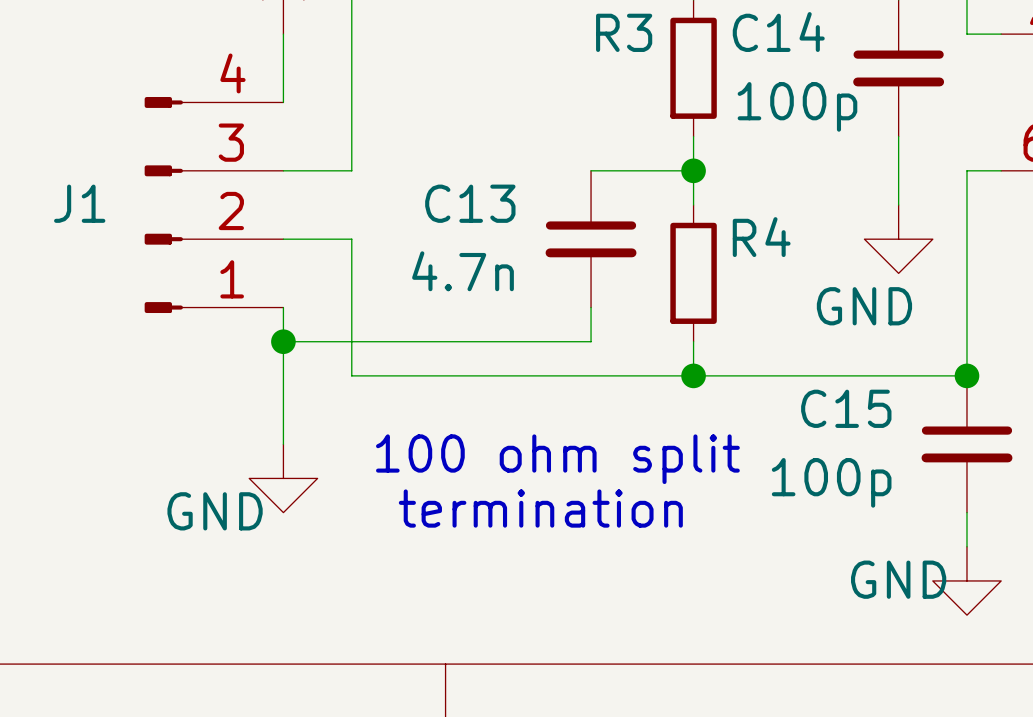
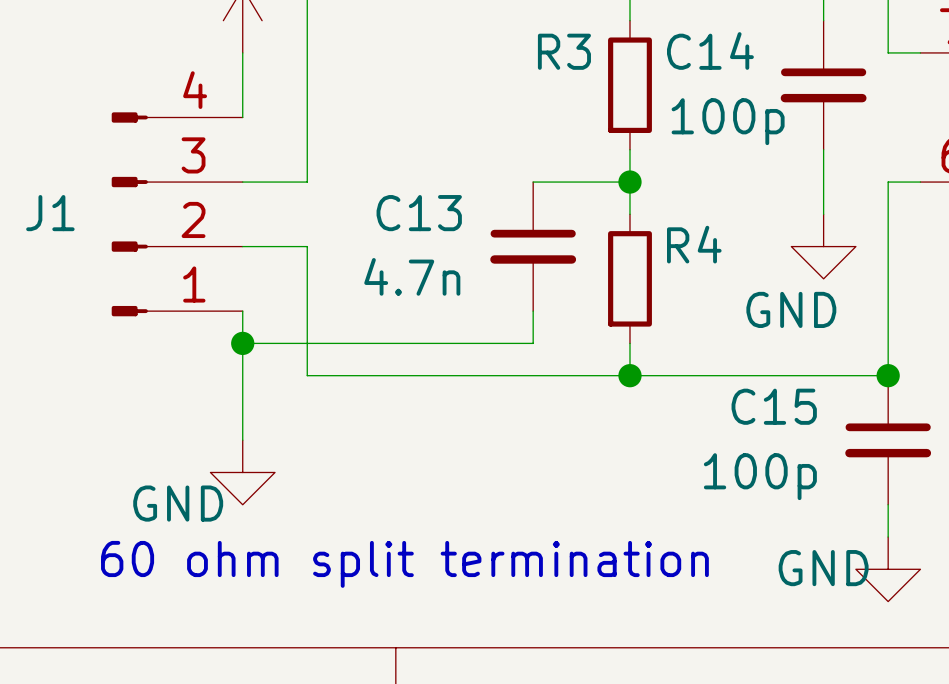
text: 100 ohm split (557, 459) -> none
text: termination (540, 508) -> 60 ohm split termination (404, 564)

